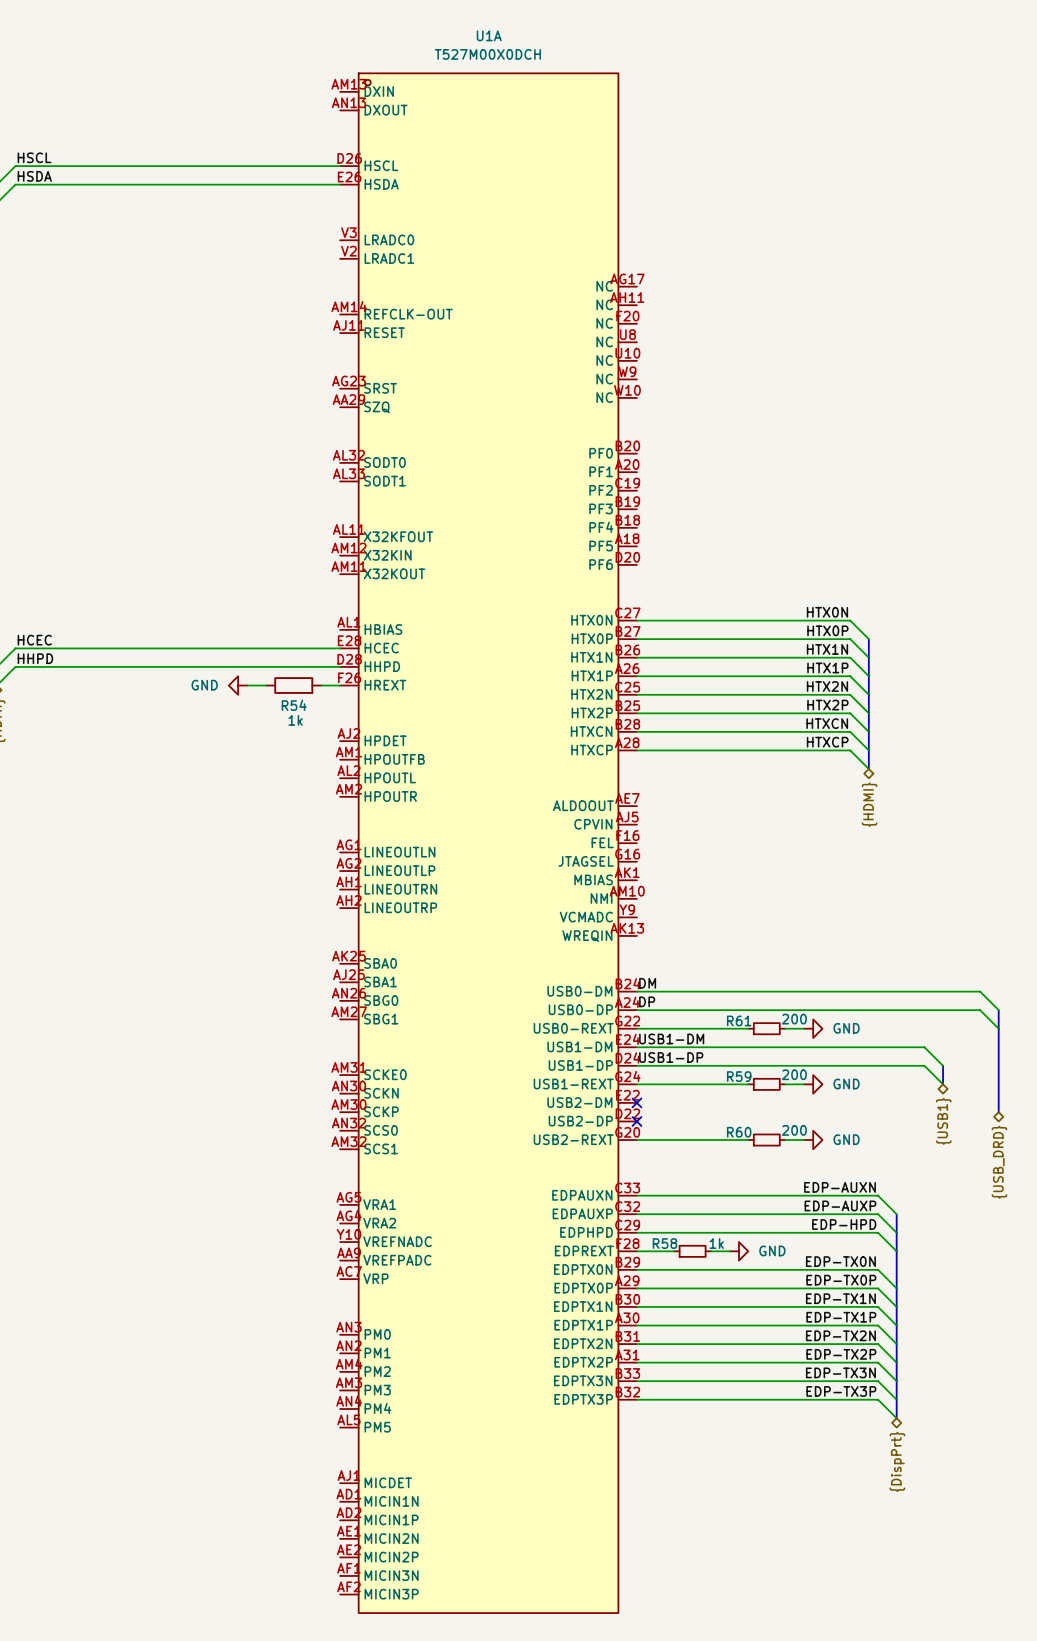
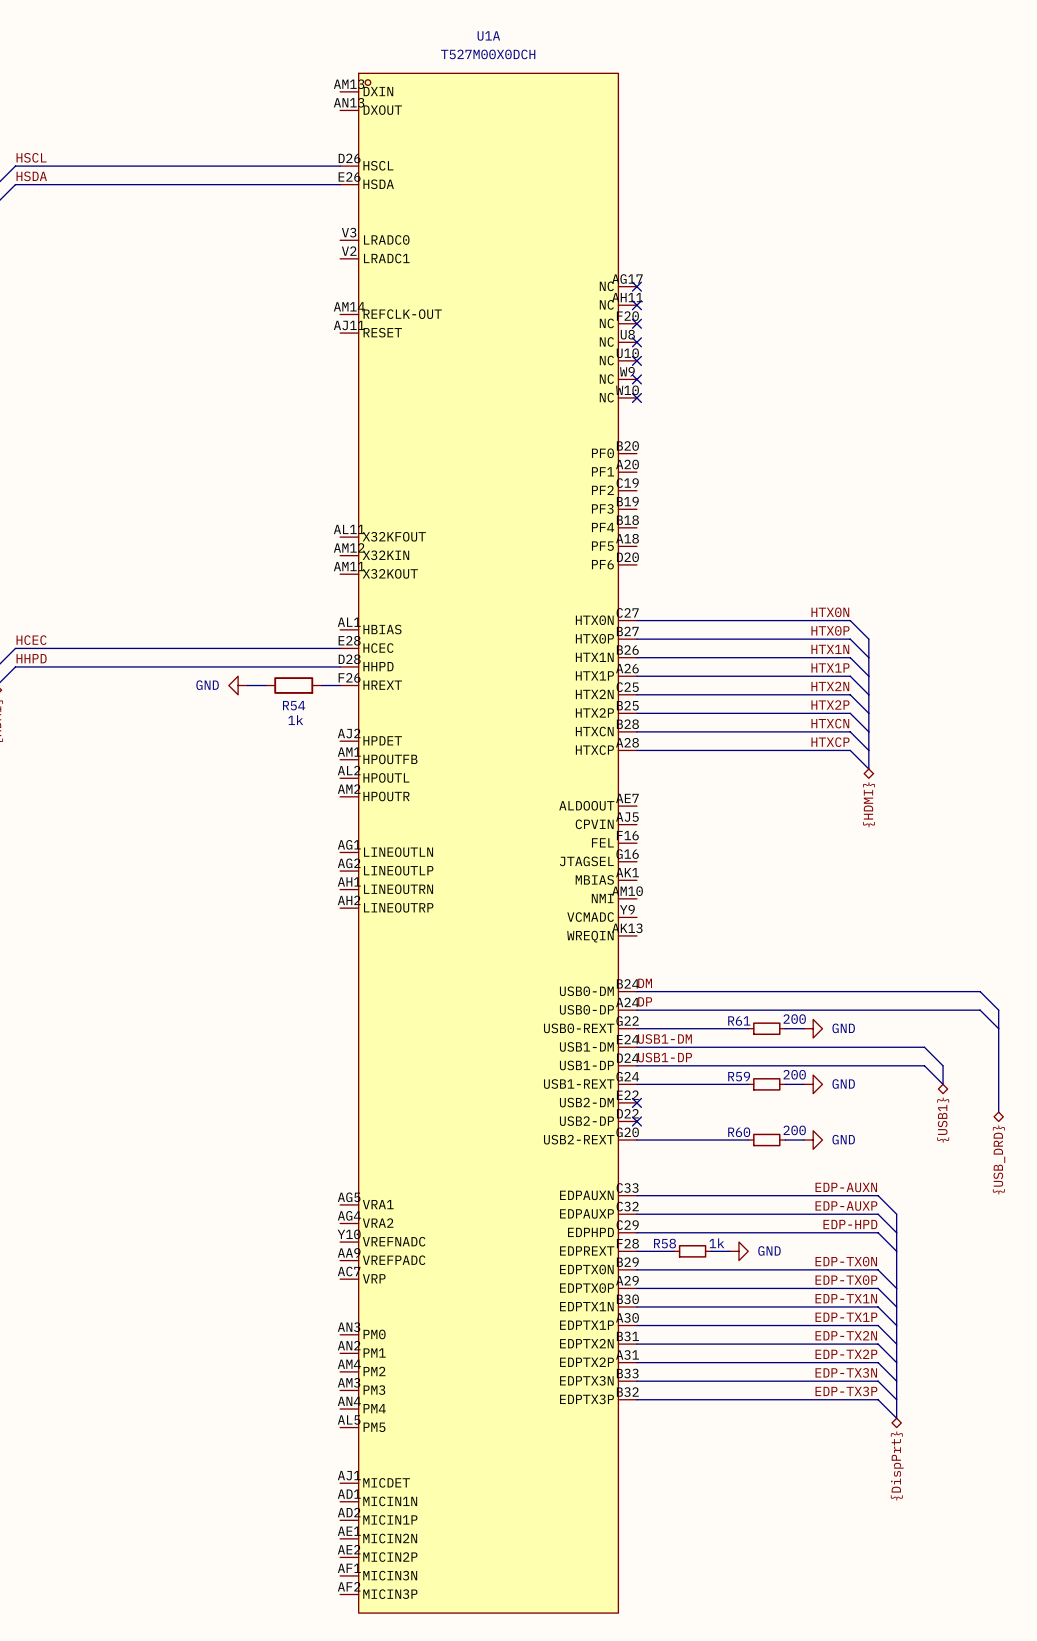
U1A symbol: [340, 73, 637, 1614] -> [340, 73, 637, 1614]
no-connect mark: none -> (636, 286)
no-connect mark: none -> (636, 305)
no-connect mark: none -> (636, 323)
no-connect mark: none -> (636, 342)
no-connect mark: none -> (636, 360)
no-connect mark: none -> (636, 379)
no-connect mark: none -> (636, 397)

